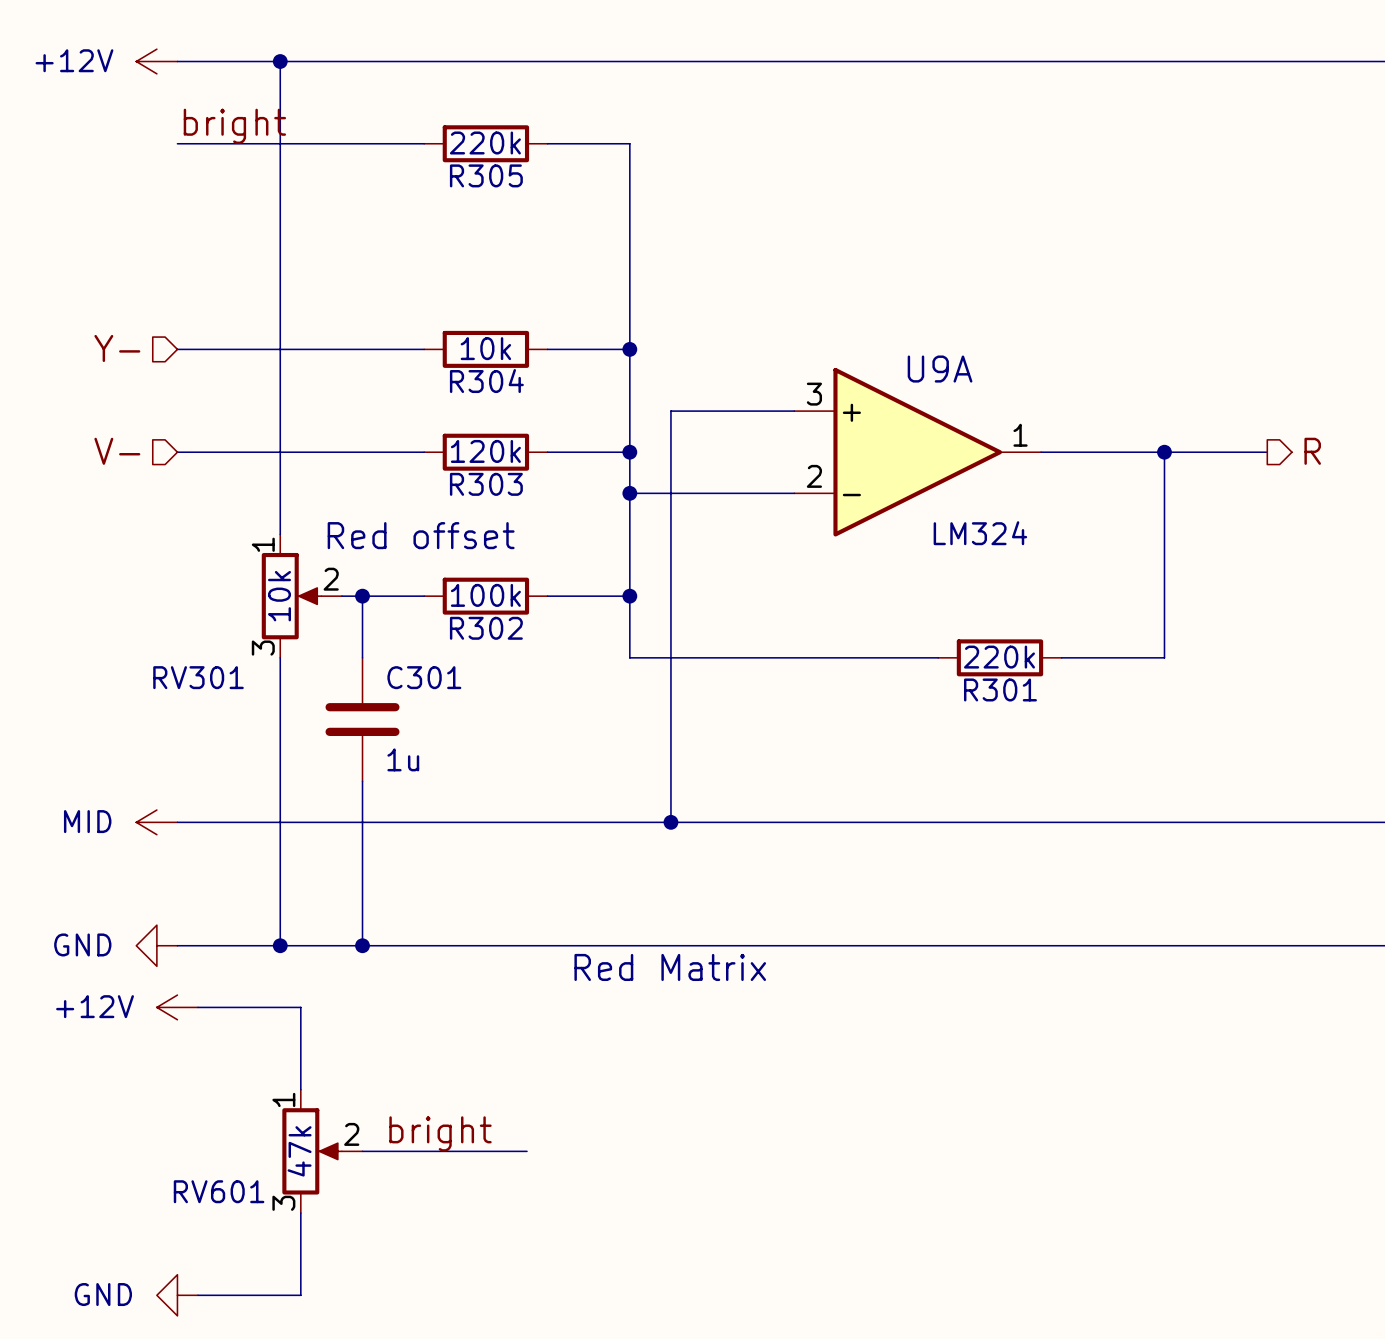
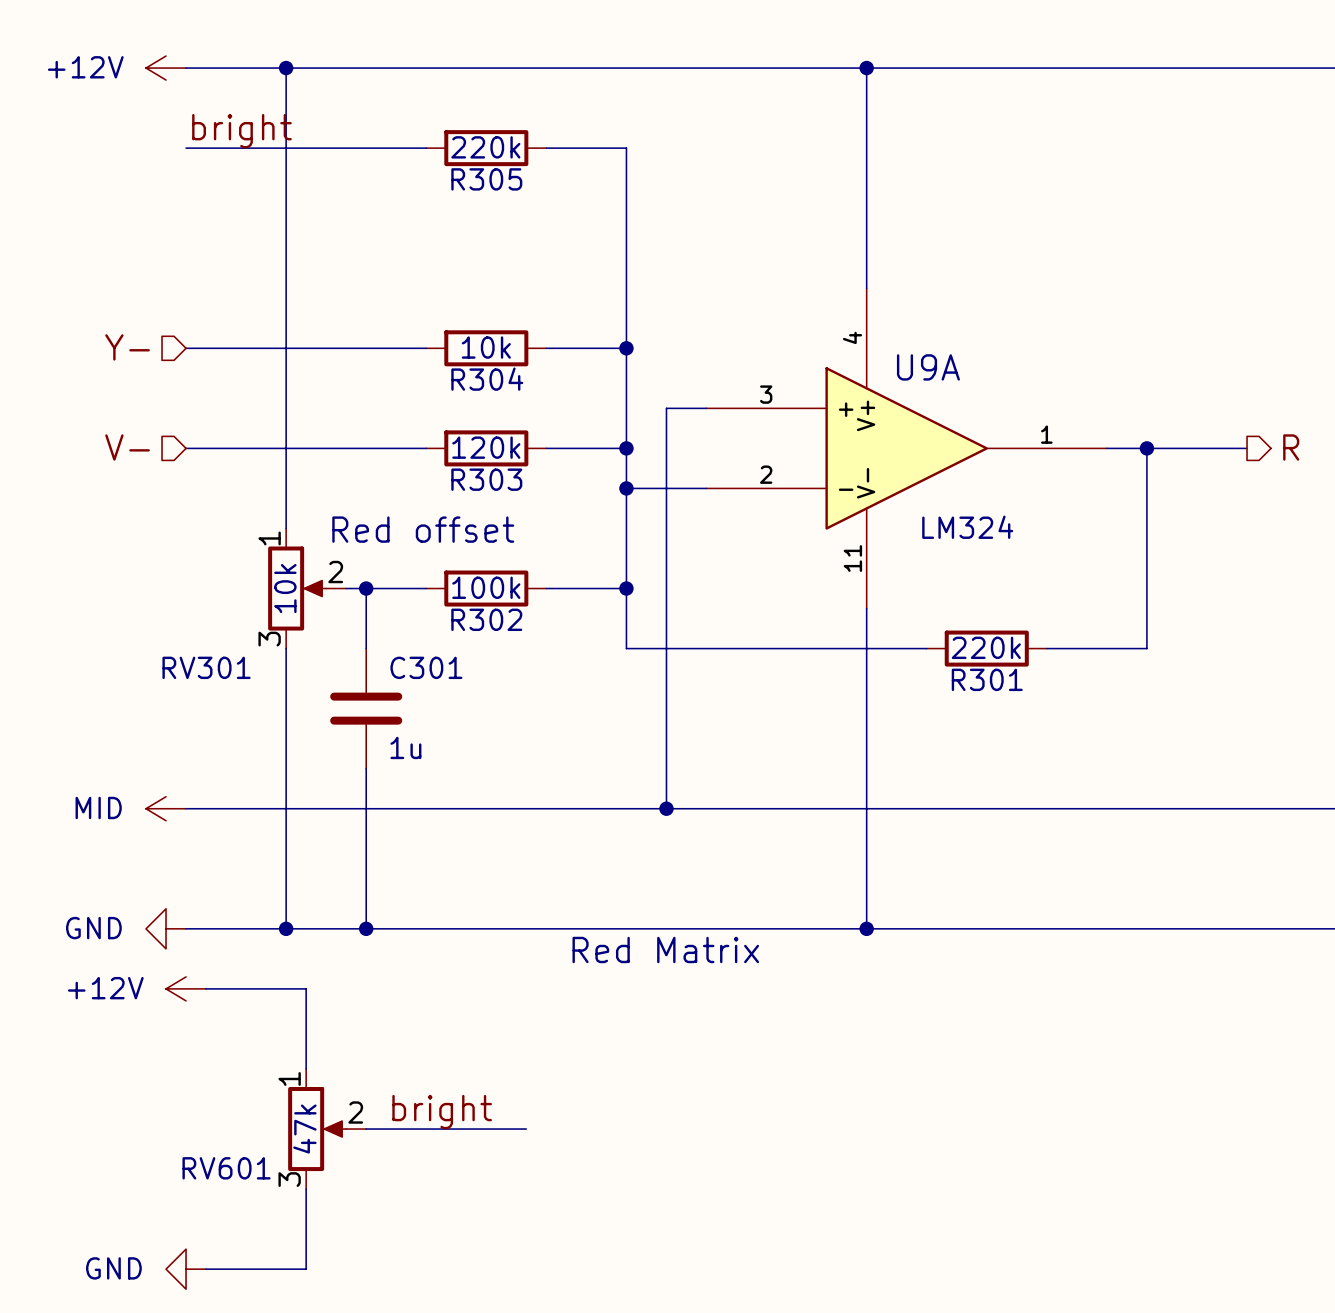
wire: none -> (866, 68) (866, 288)
junction: none -> (866, 68)
U9A symbol: [794, 367, 1042, 537] -> [706, 288, 1107, 609]
wire: none -> (866, 608) (866, 928)
junction: none -> (866, 928)

